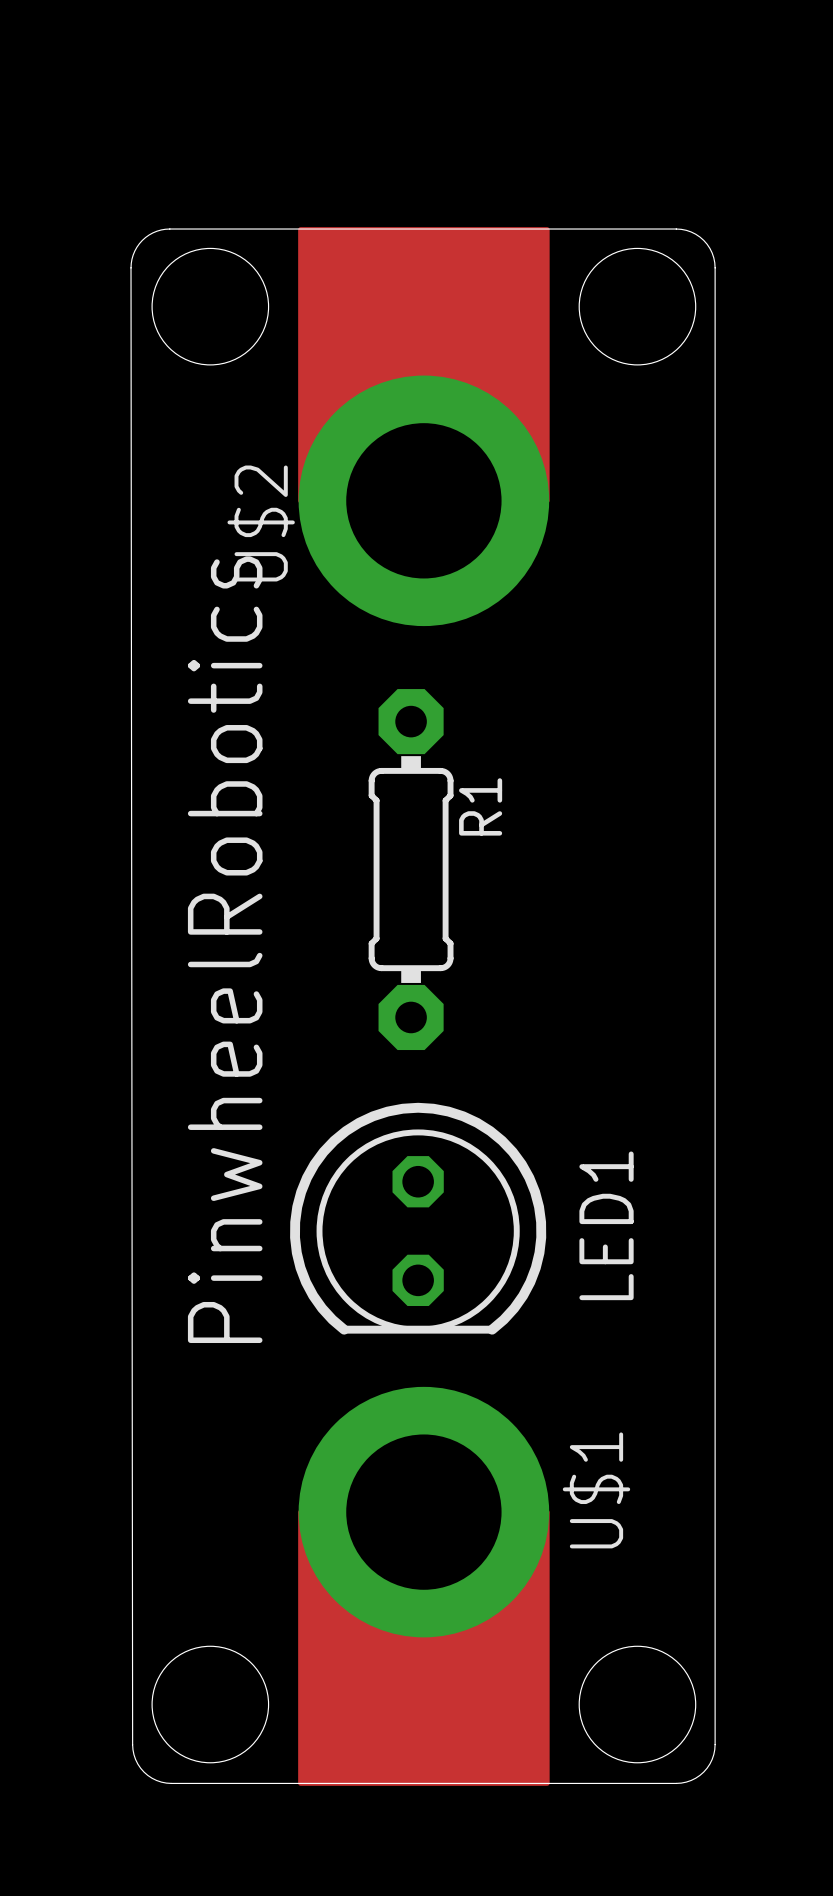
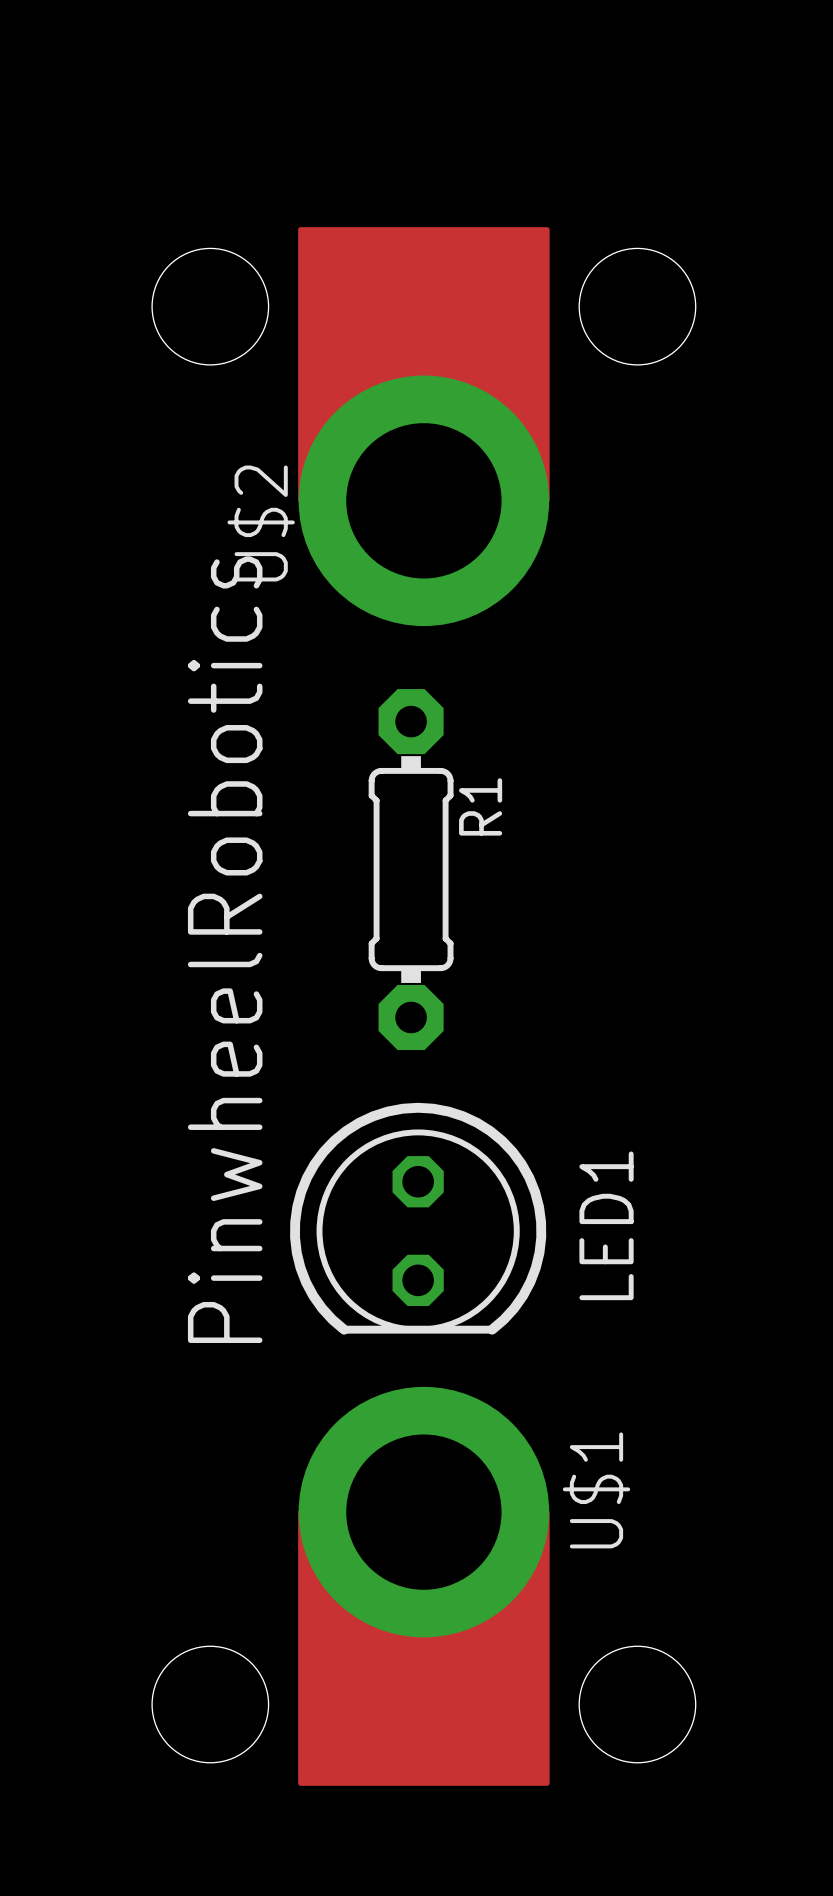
board edge: (169, 229) (676, 229) (691, 231) (699, 237) (707, 244) (713, 257) (715, 1744) (712, 1759) (707, 1768) (699, 1775) (686, 1782) (171, 1783) (156, 1780) (147, 1775) (137, 1764) (133, 1754) (131, 267) (133, 255) (142, 240) (152, 232) (169, 229) -> none

